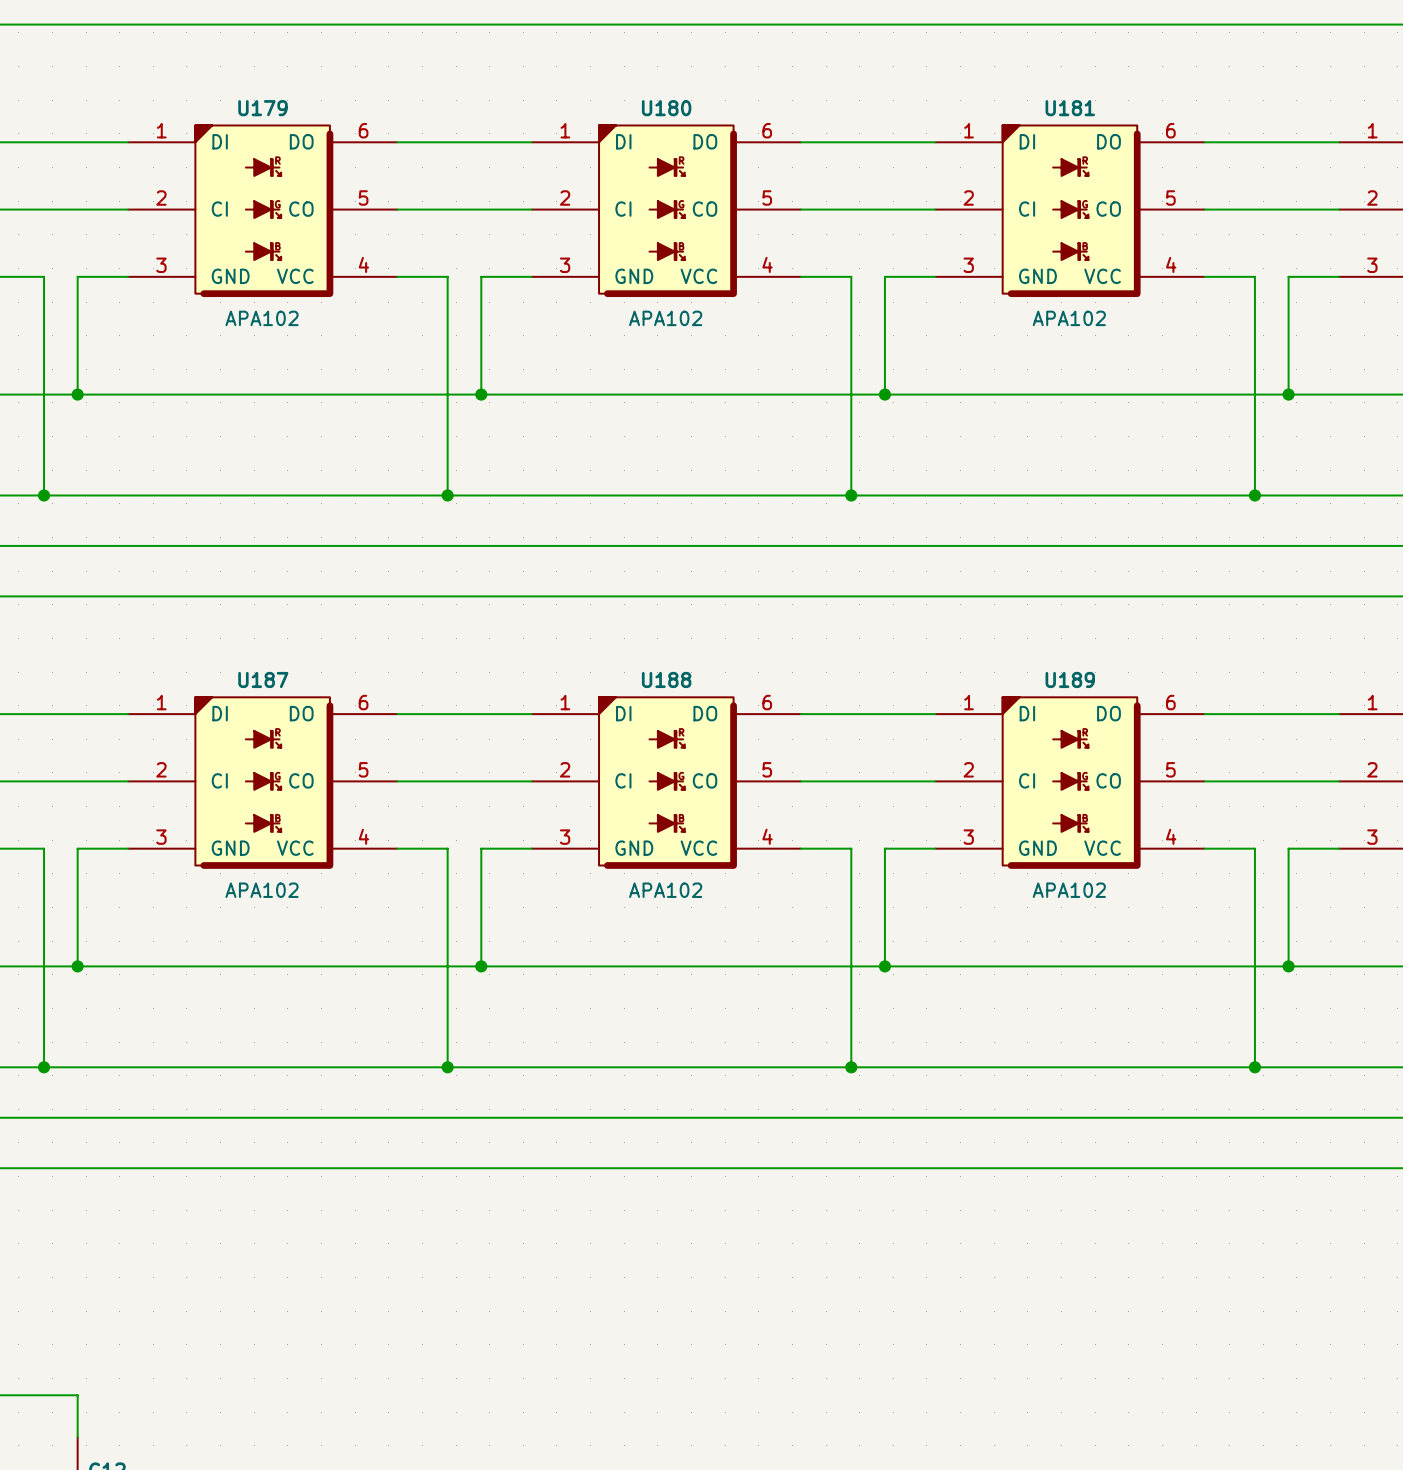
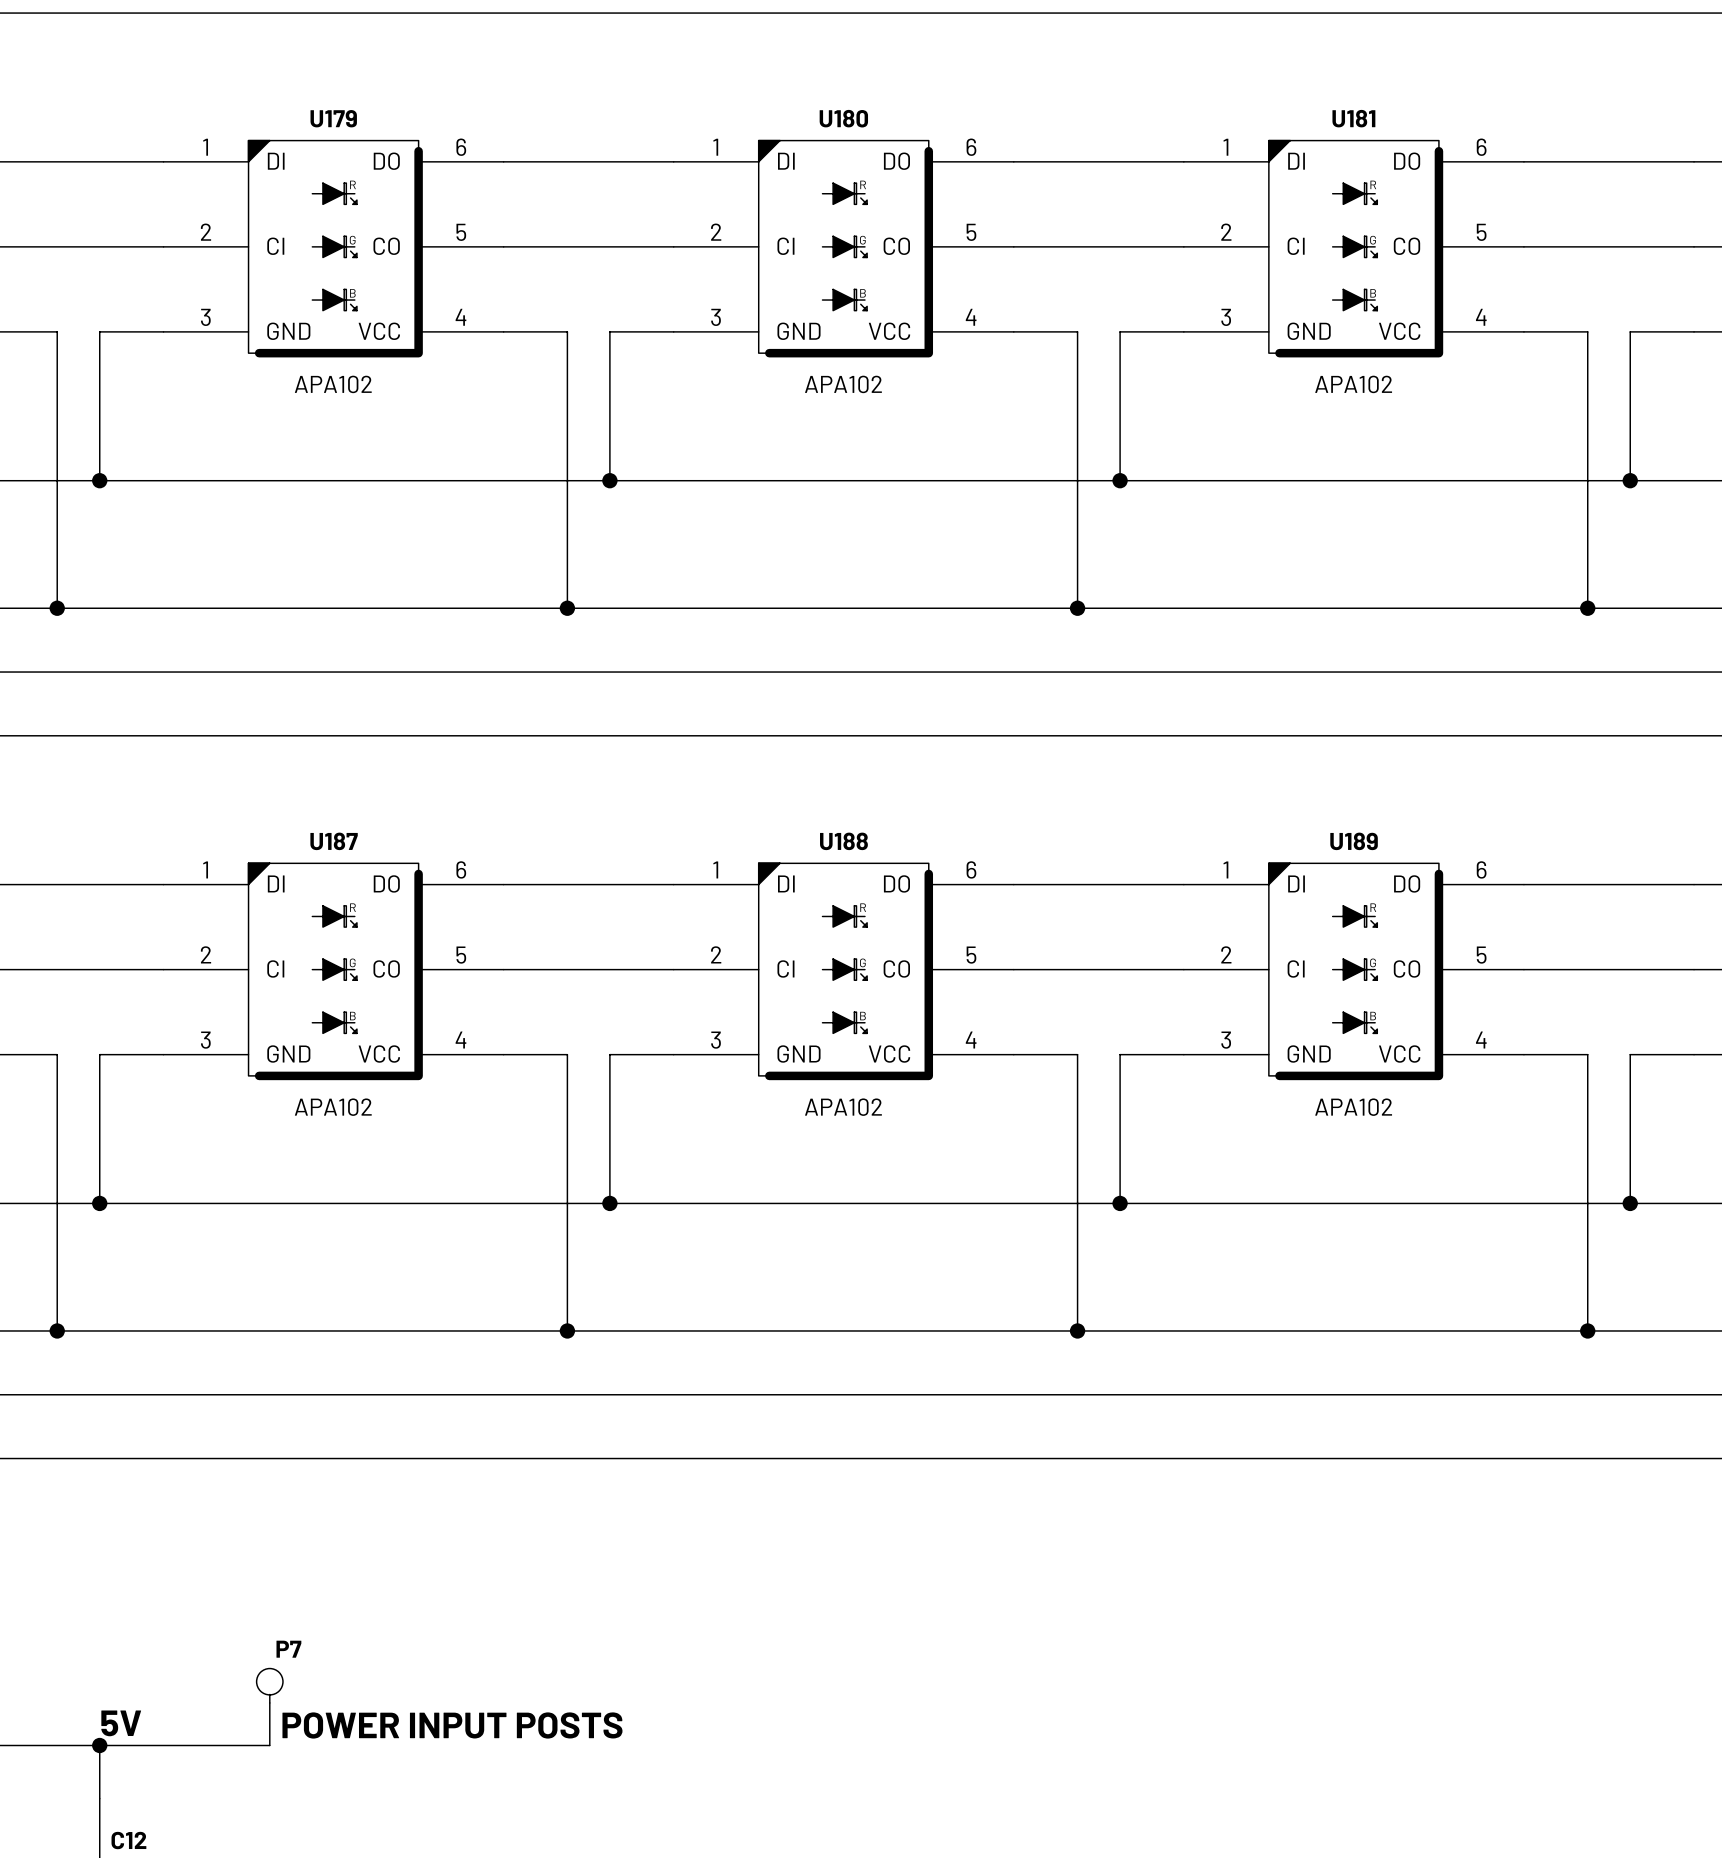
P7: none -> (269, 1707)
label: none -> 5V (121, 1723)
text: none -> POWER INPUT POSTS (452, 1725)
wire: none -> (99, 1745) (269, 1745)
junction: none -> (99, 1745)

